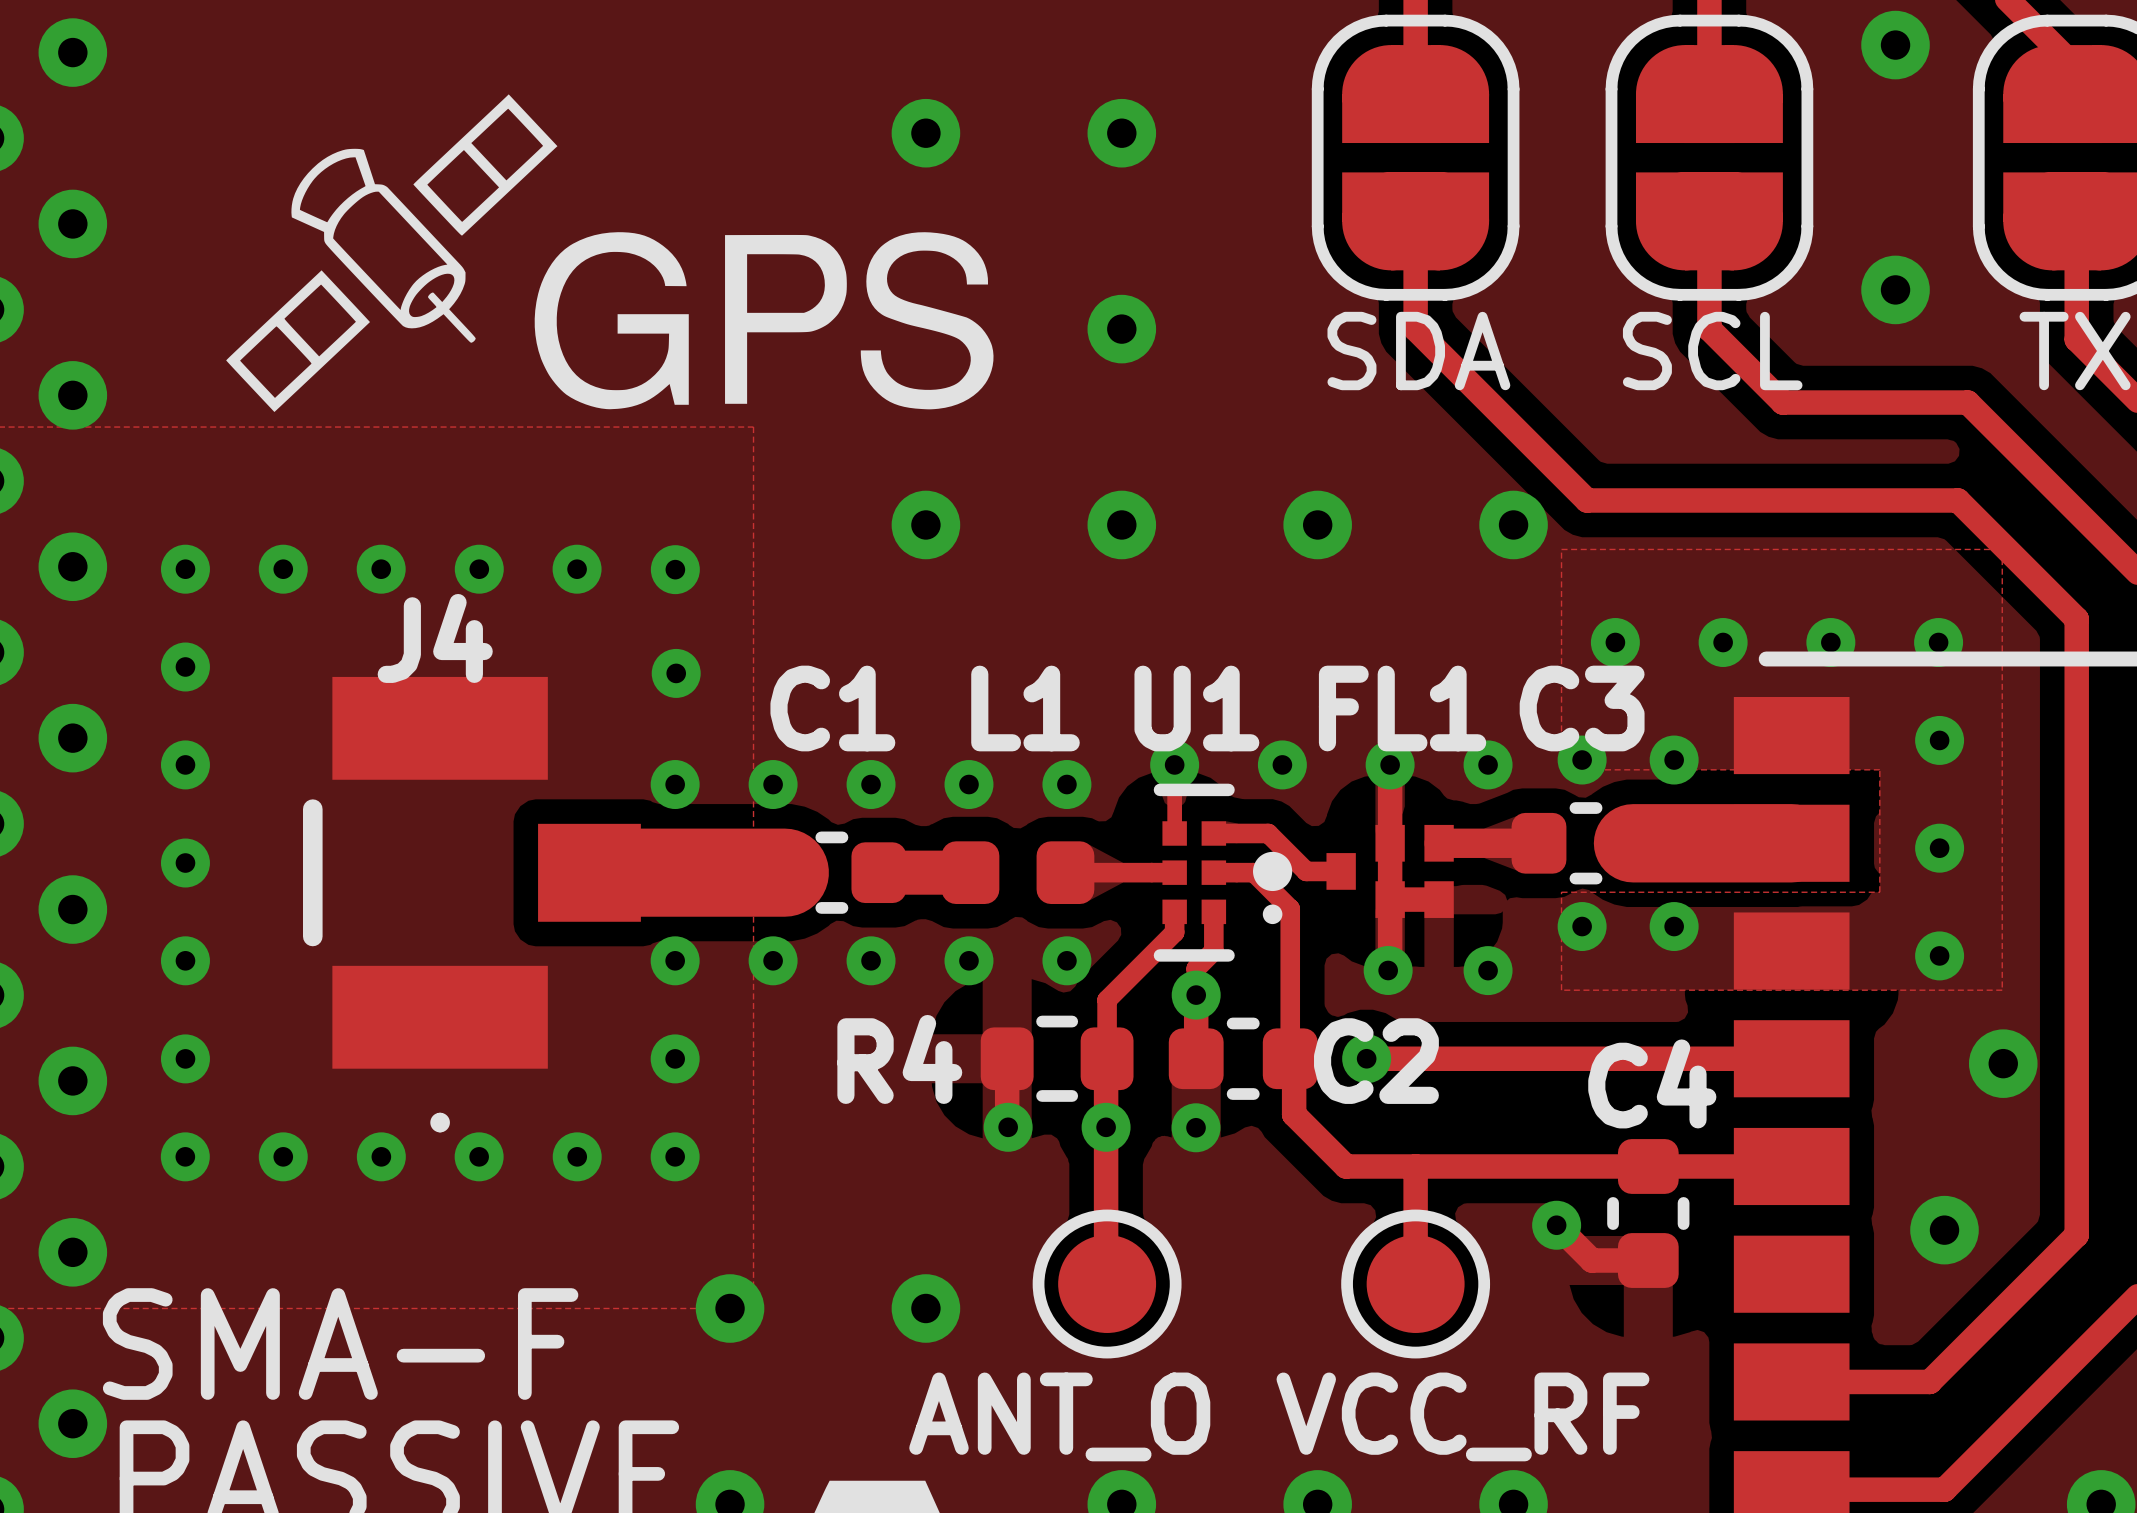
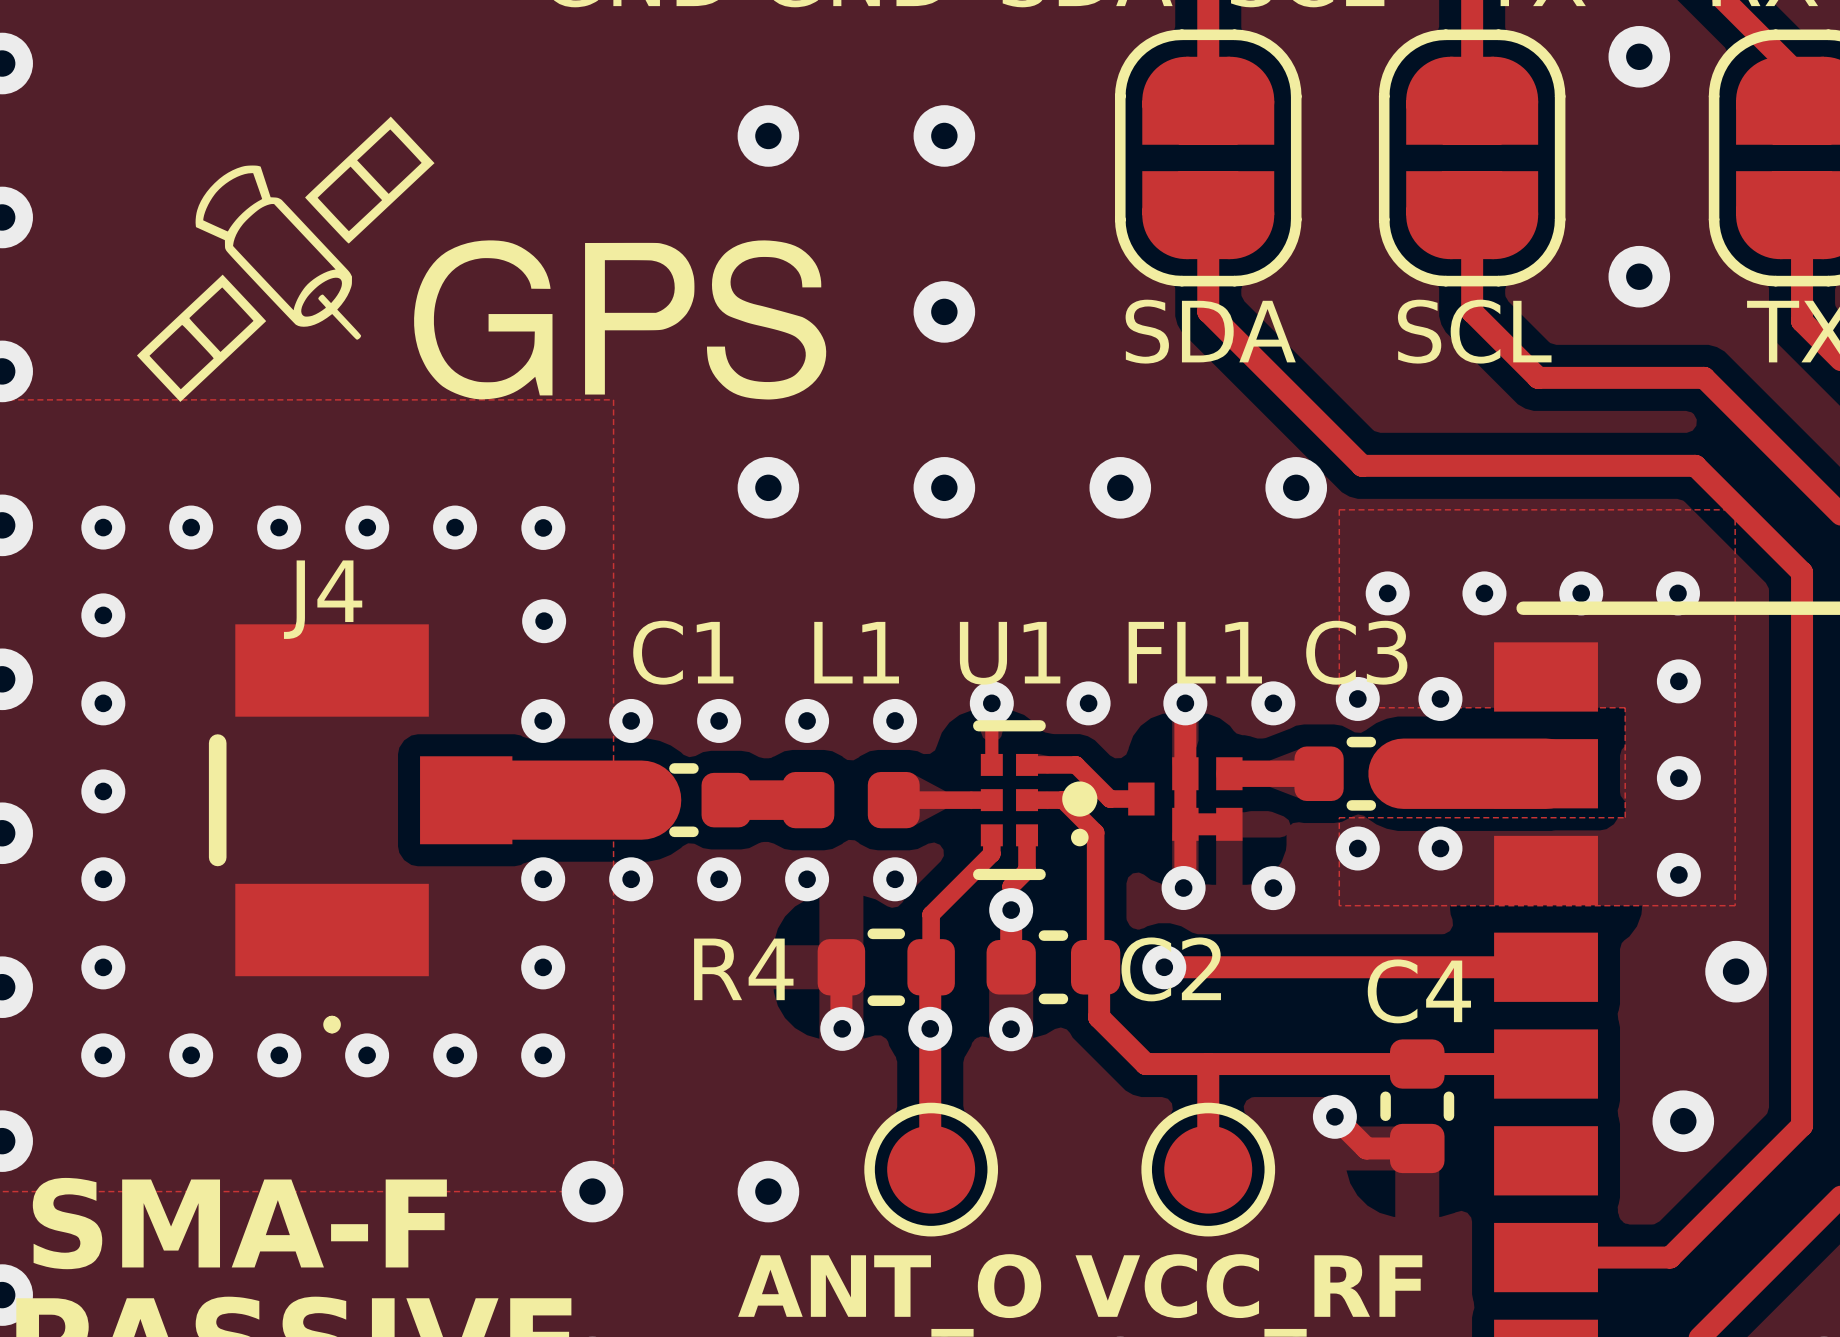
drawing position: (609, 253) -> (481, 259)

